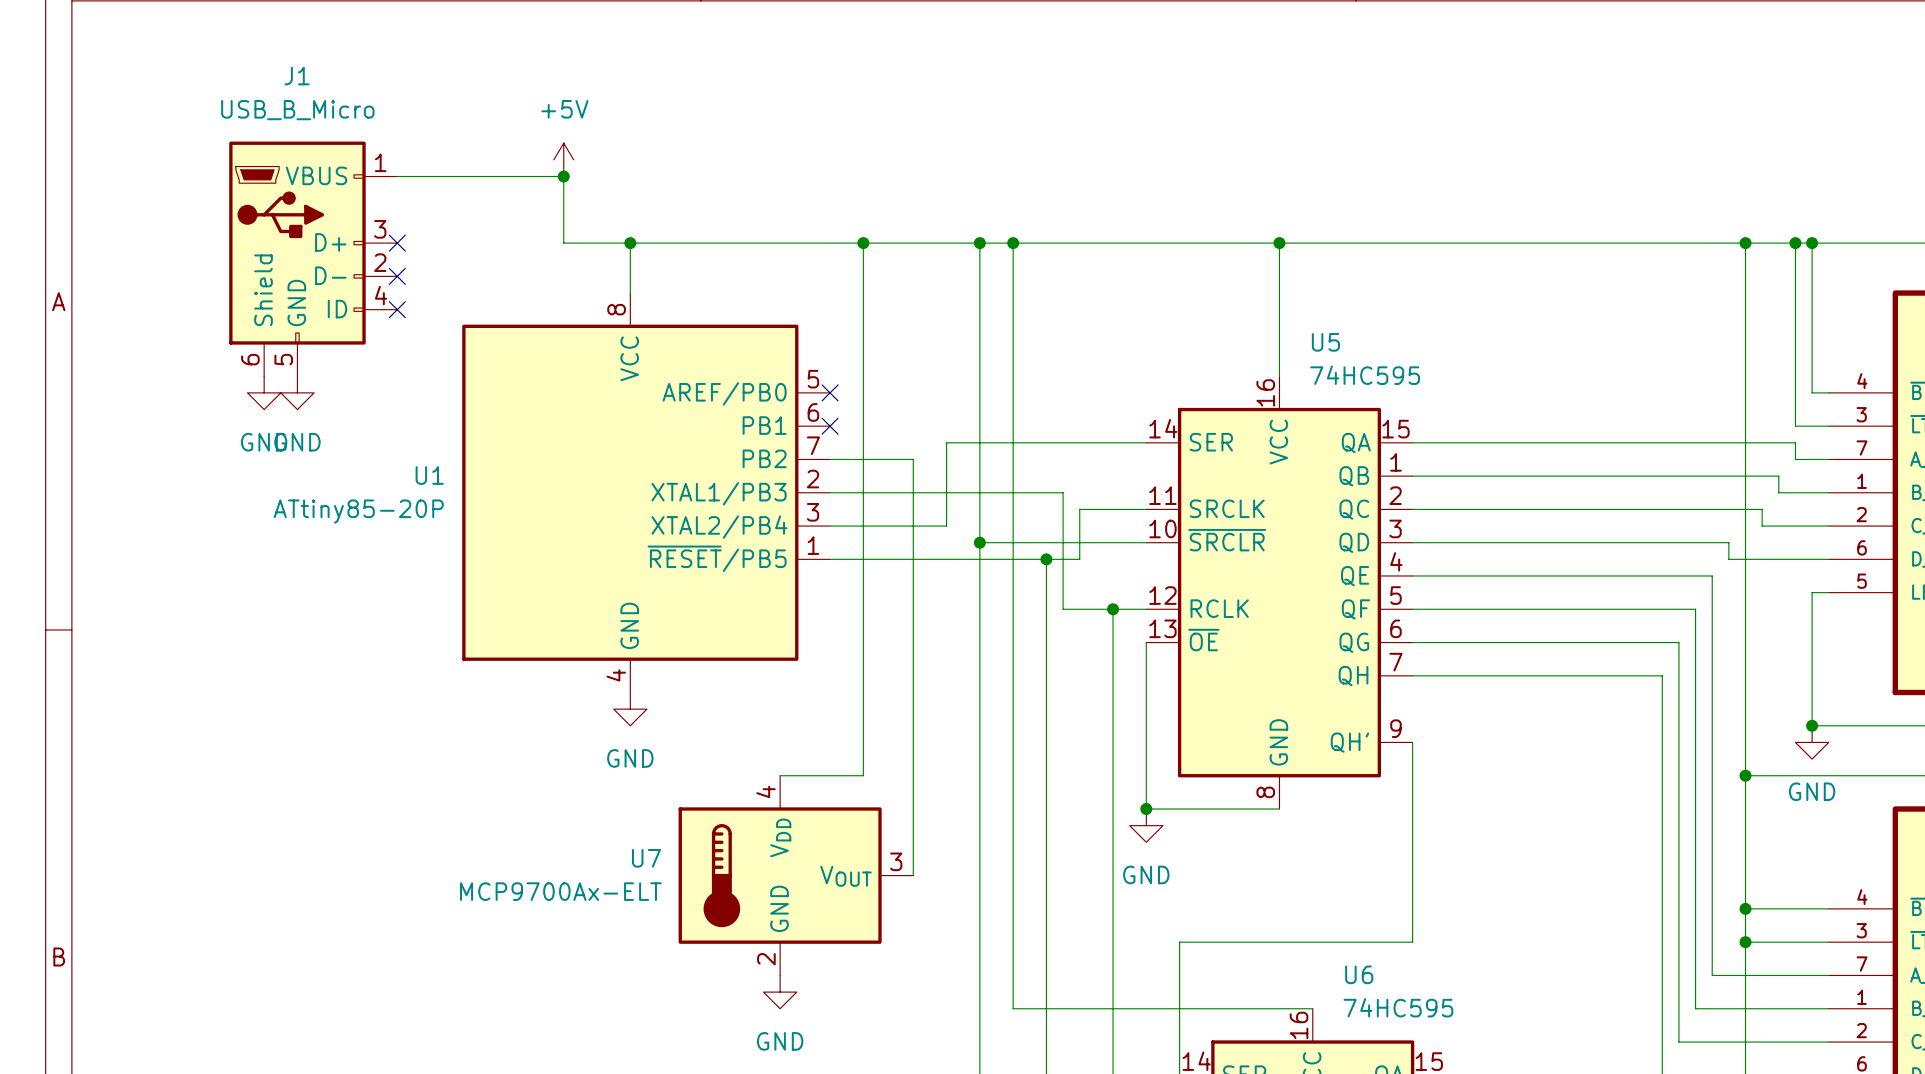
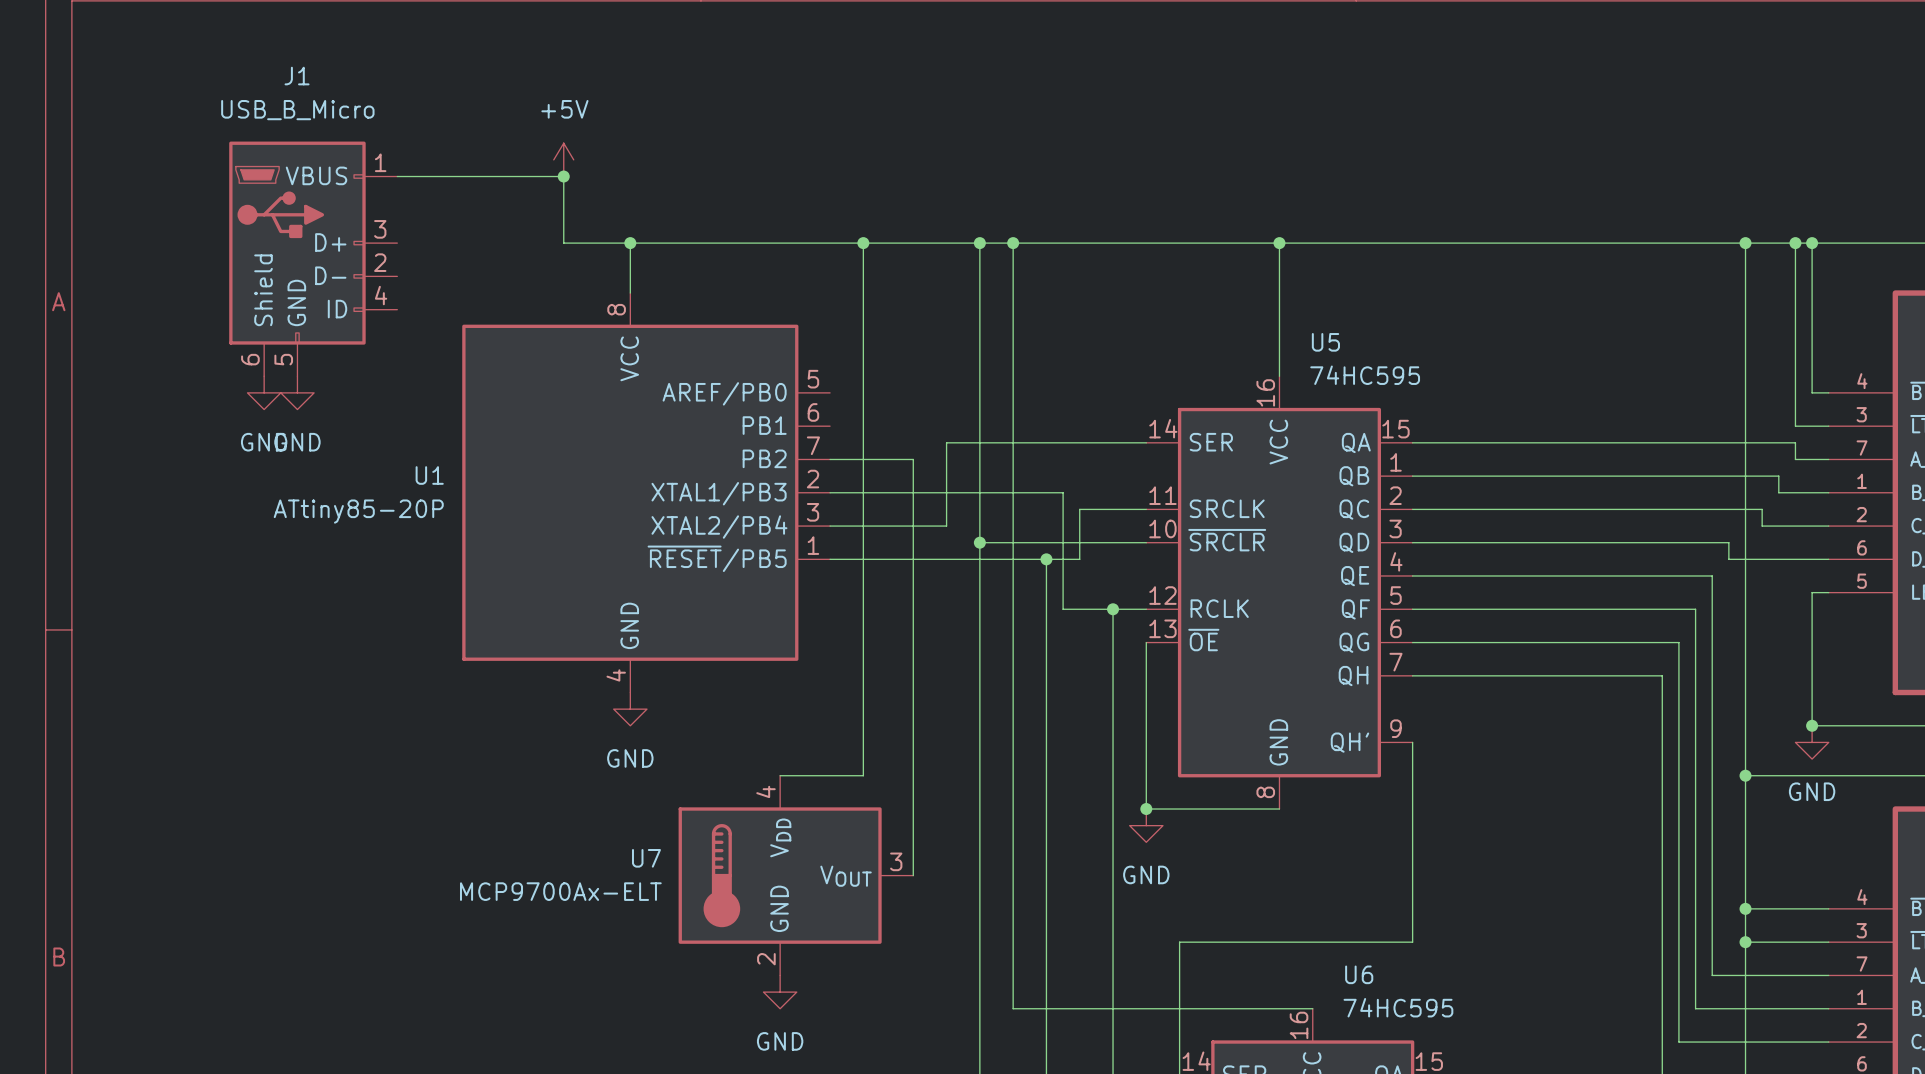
no-connect mark: (397, 243) -> none
no-connect mark: (397, 276) -> none
no-connect mark: (397, 309) -> none
no-connect mark: (830, 392) -> none
no-connect mark: (830, 426) -> none

